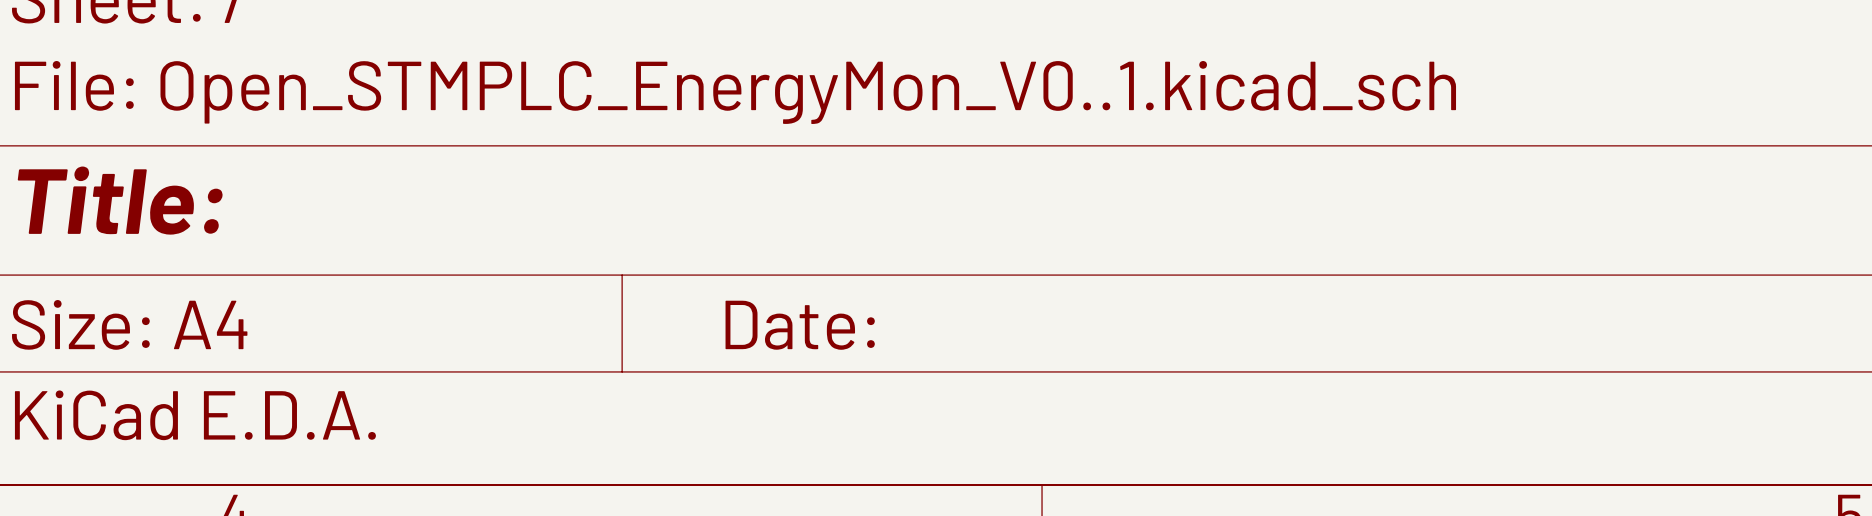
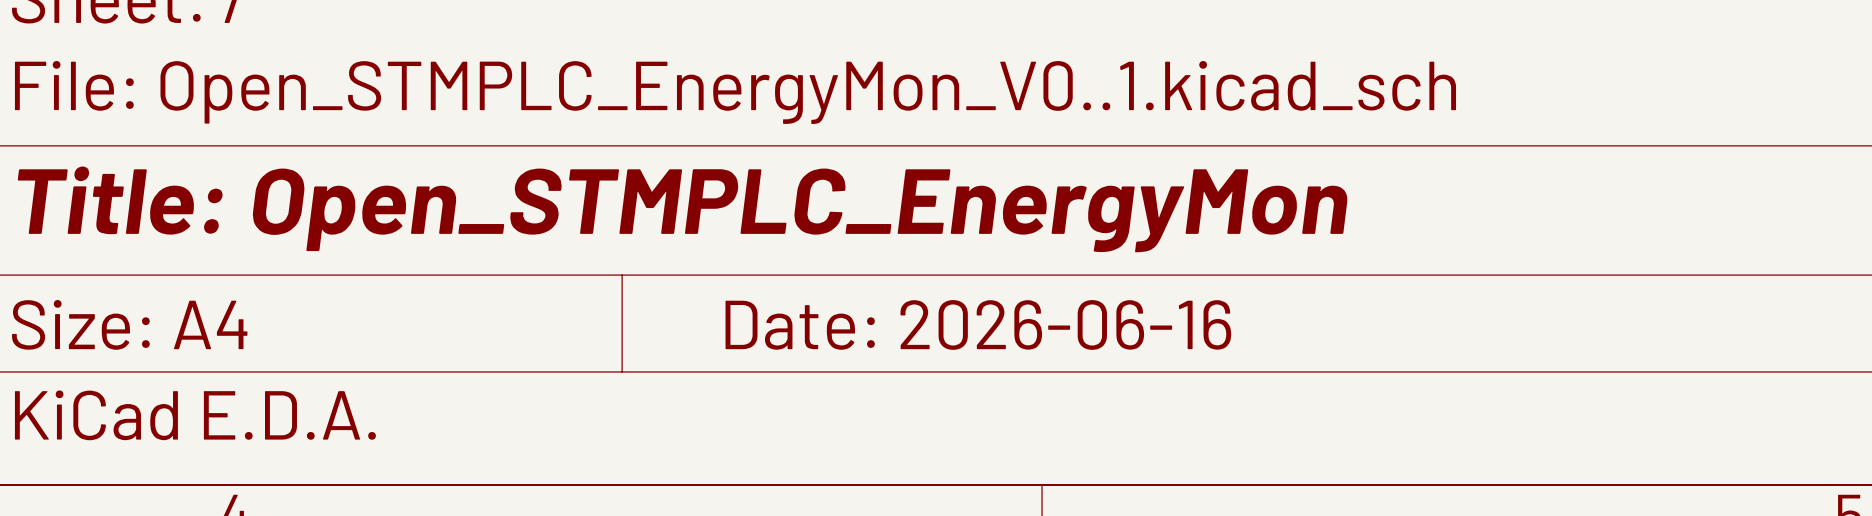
title block: Title: (120, 200) -> Title: Open_STMPLC_EnergyMon (682, 209)
title block: Date: (800, 325) -> Date: 2026-06-16 (978, 324)

